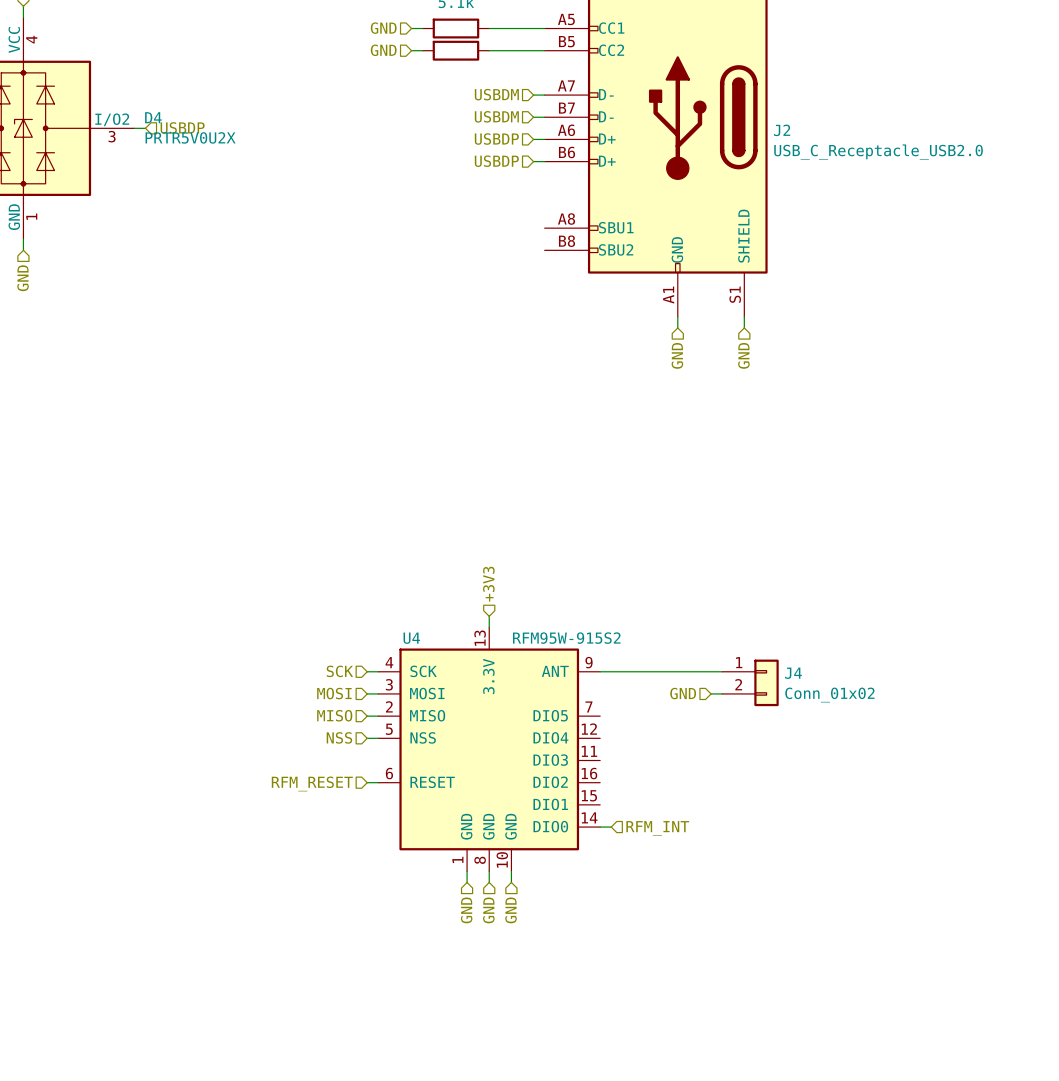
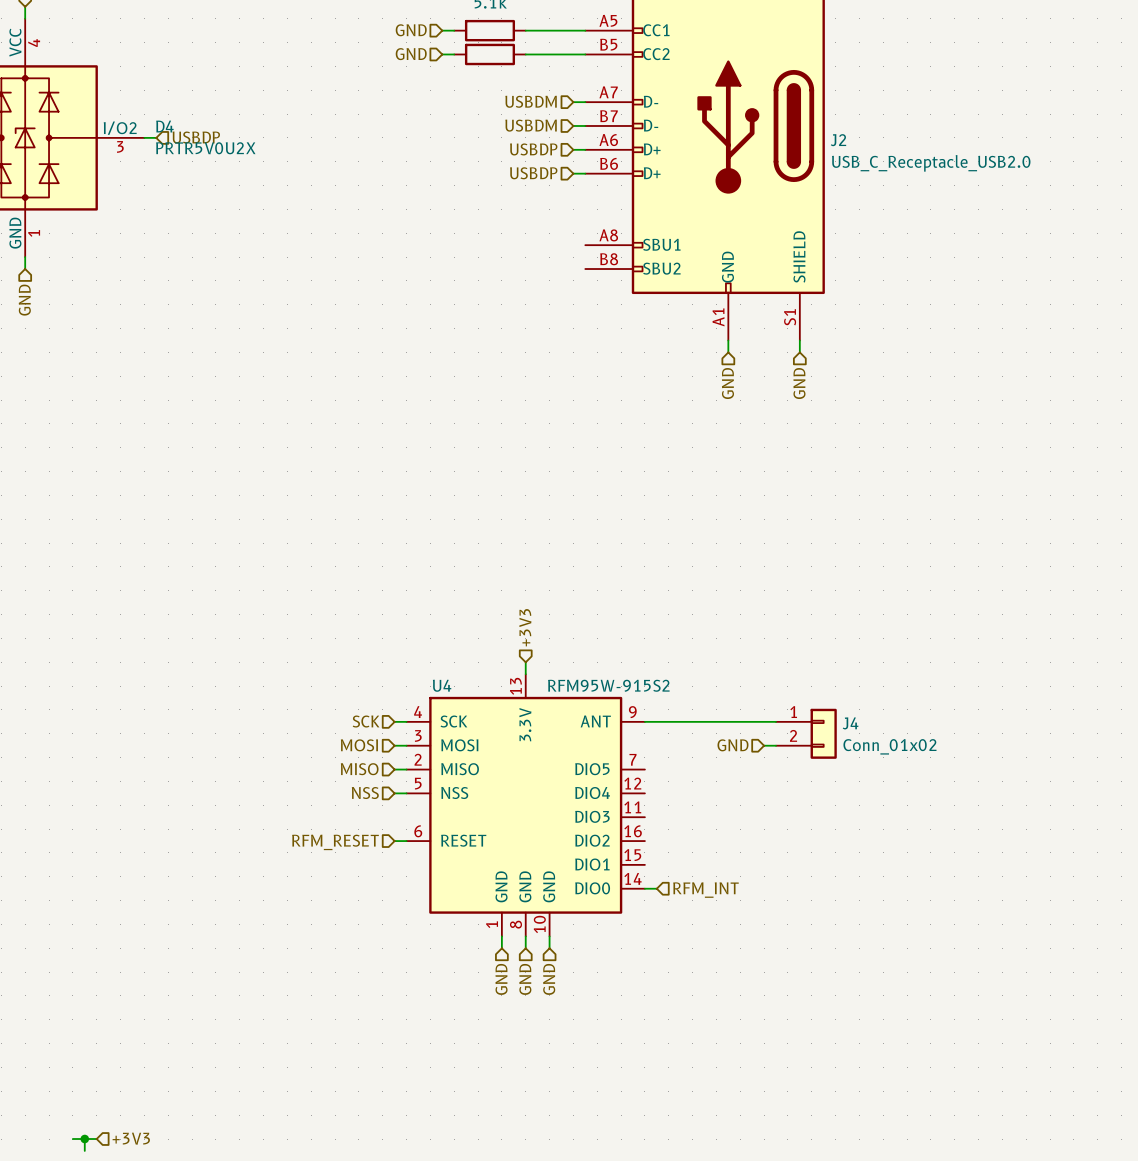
wire: none -> (72, 1139) (96, 1139)
wire: none -> (84, 1139) (84, 1150)
junction: none -> (84, 1139)
hierarchical label: none -> +3V3 (131, 1138)

